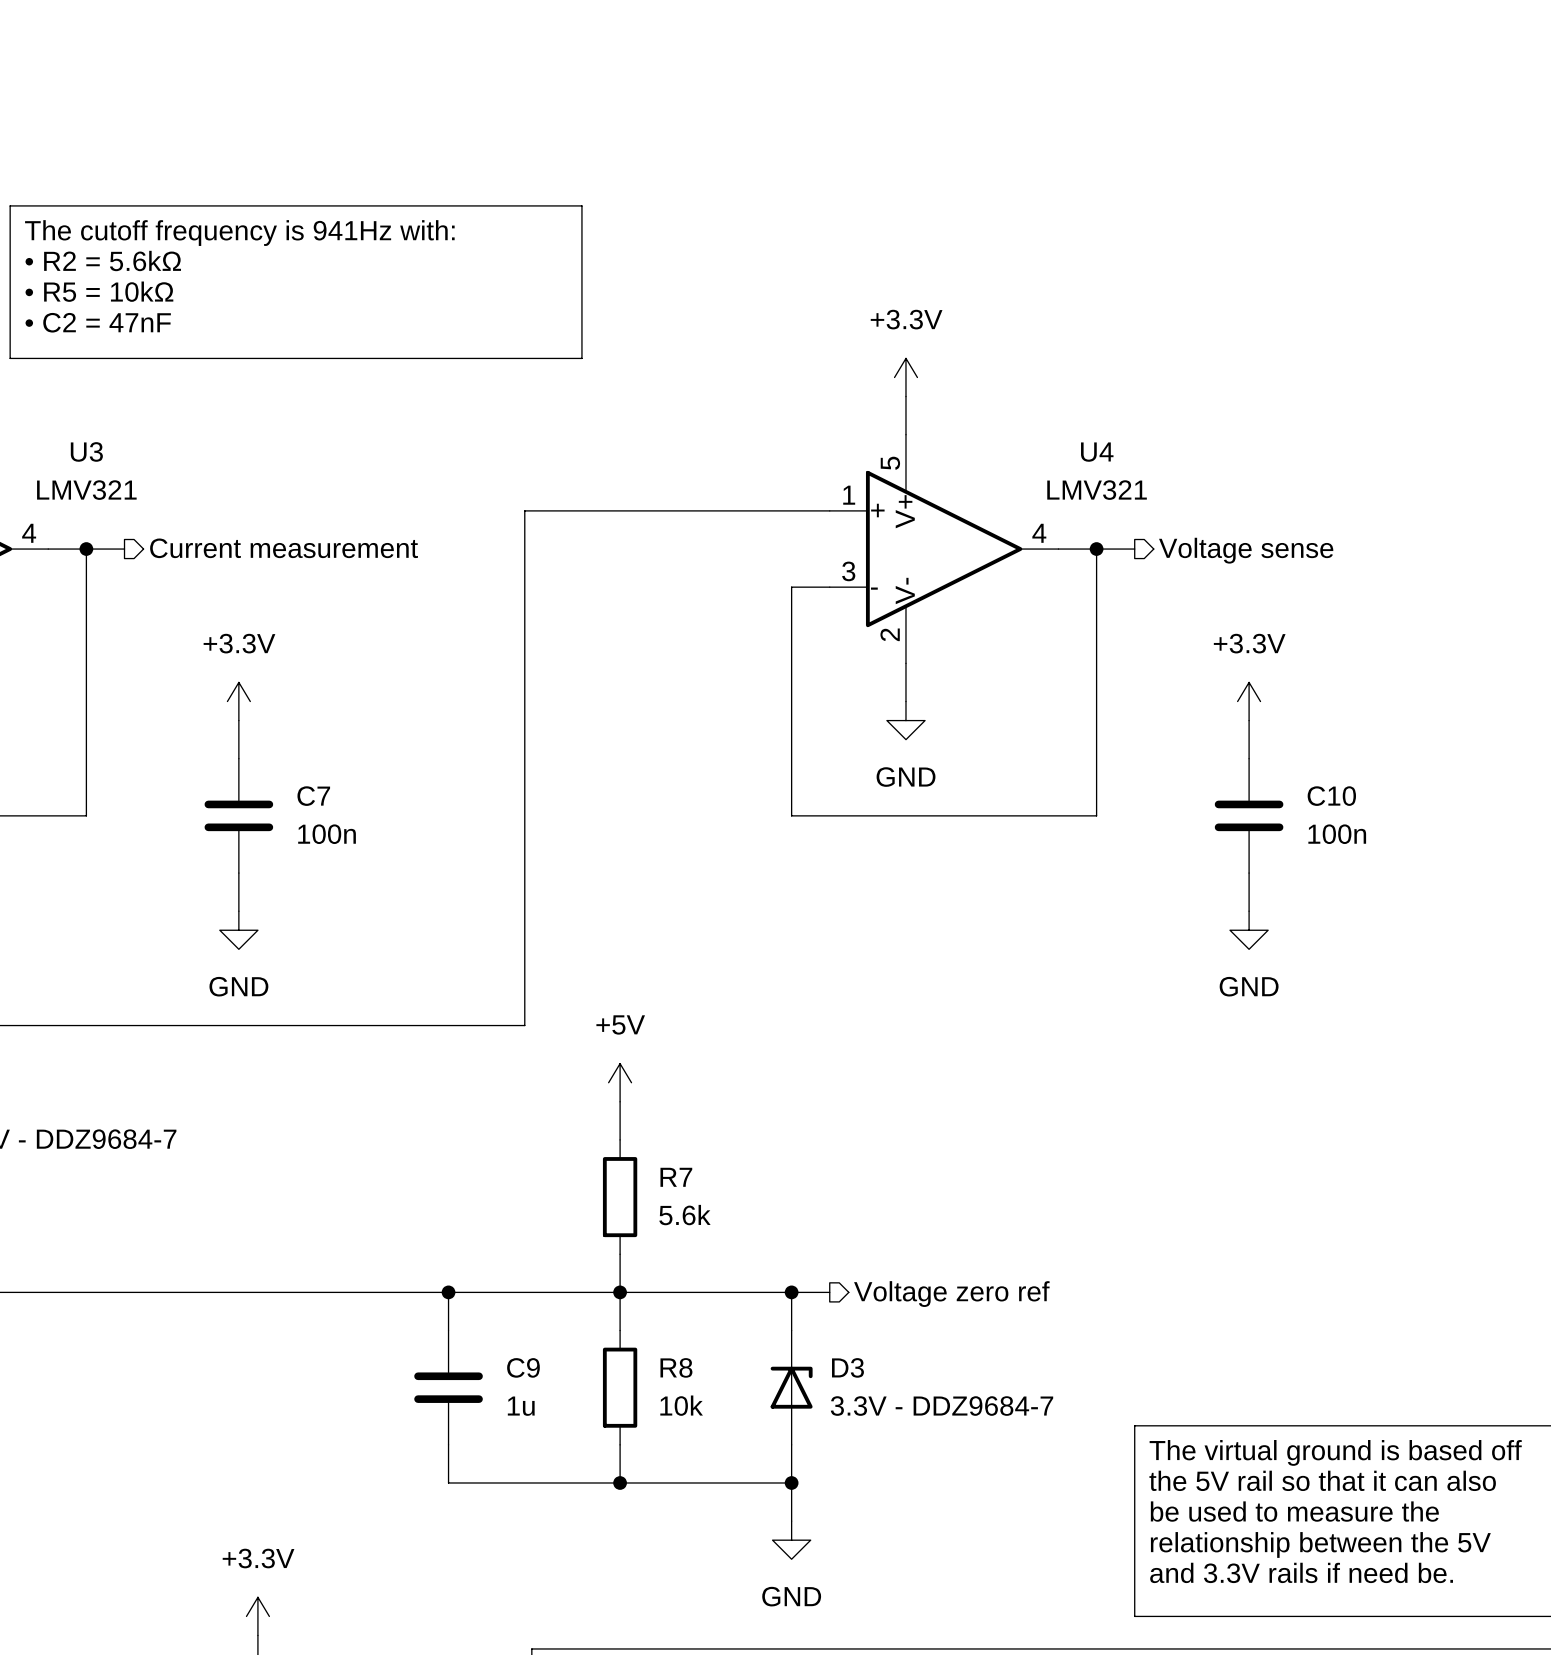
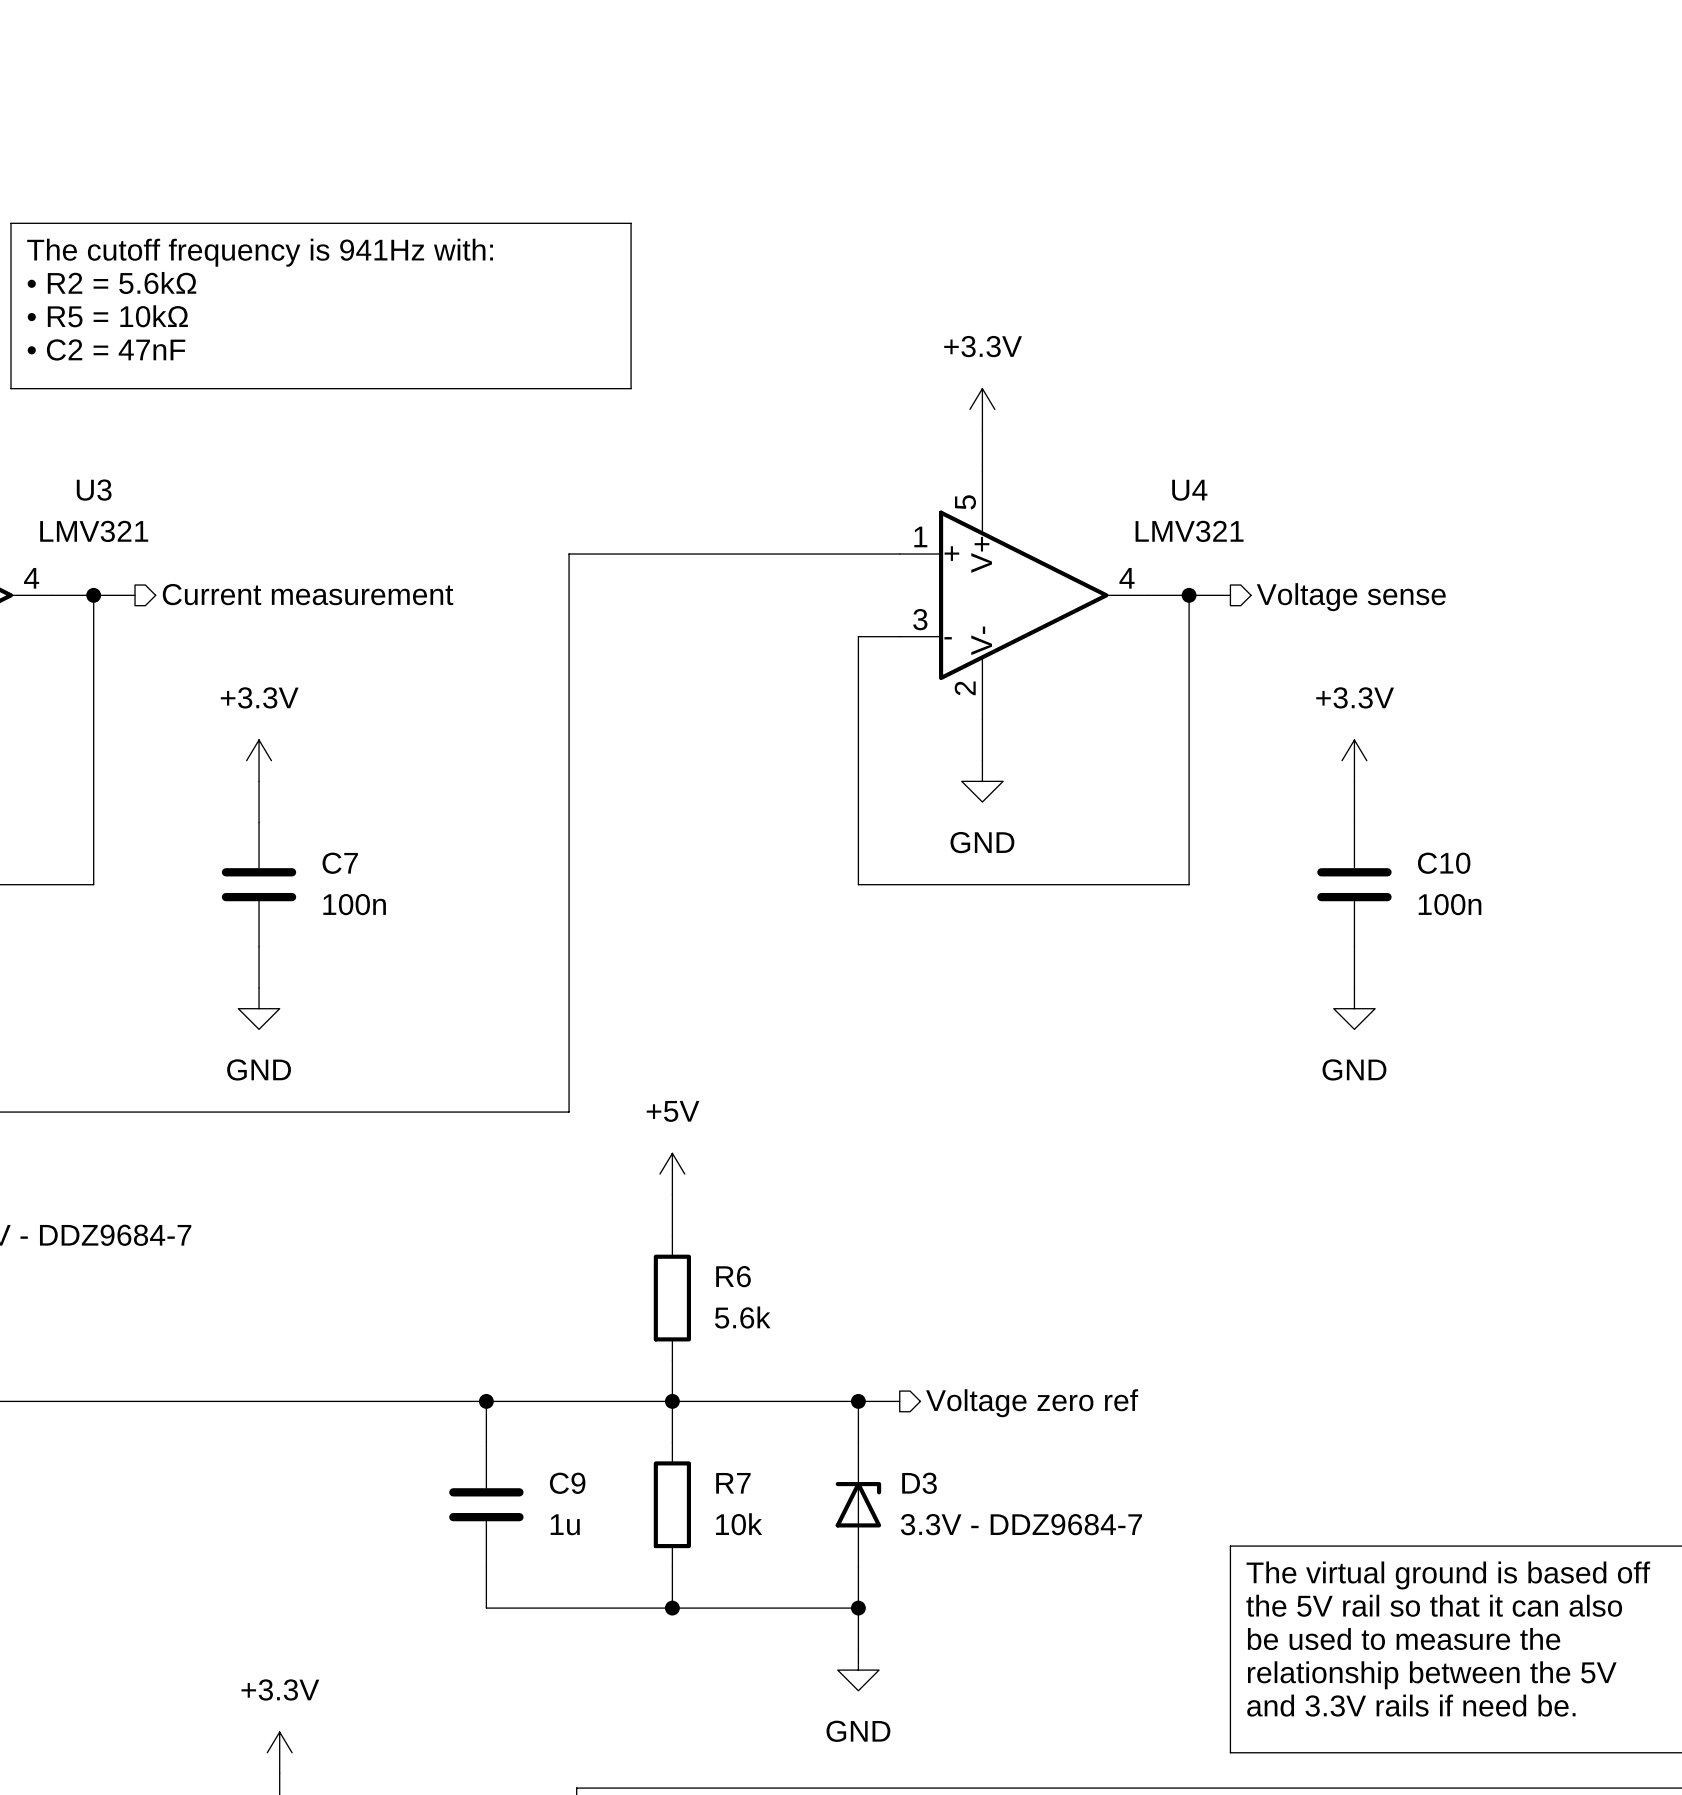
R7 name: R7 (676, 1177) -> R6 (733, 1276)
R8 name: R8 (676, 1367) -> R7 (733, 1483)

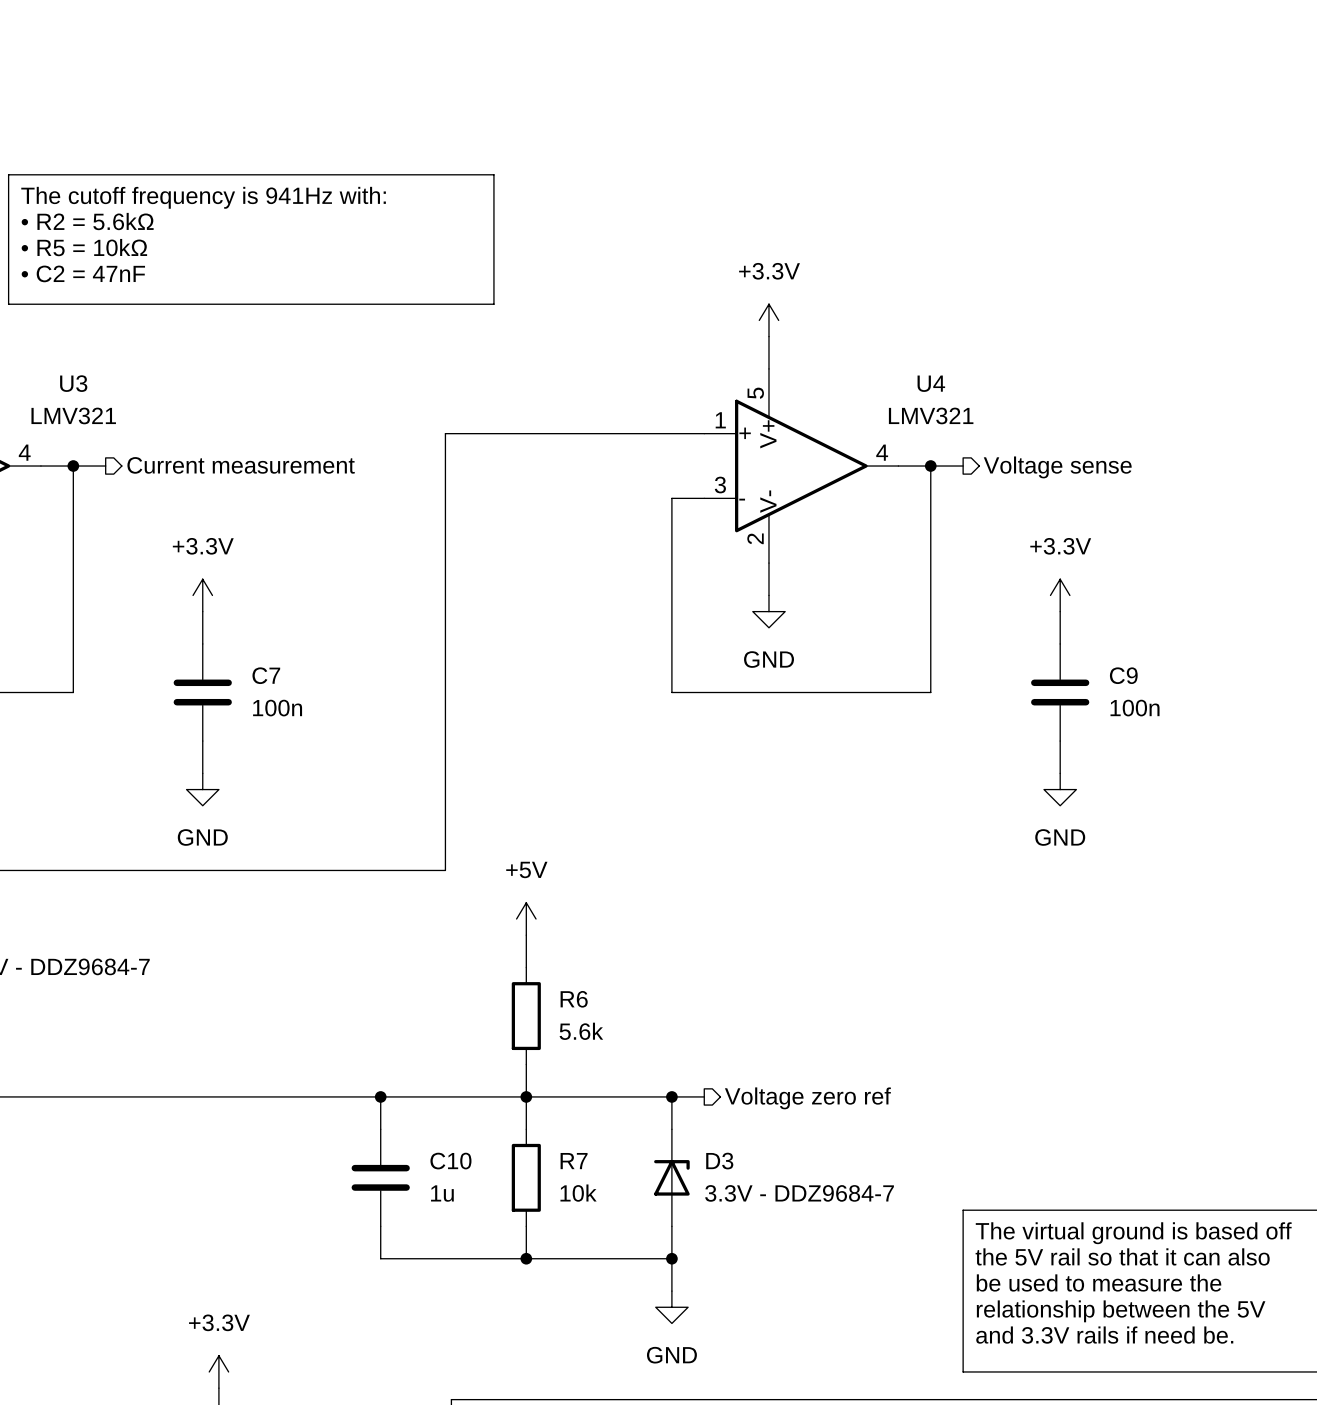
C10 name: C10 (1444, 863) -> C9 (1123, 675)
C9 name: C9 (567, 1483) -> C10 (450, 1161)

